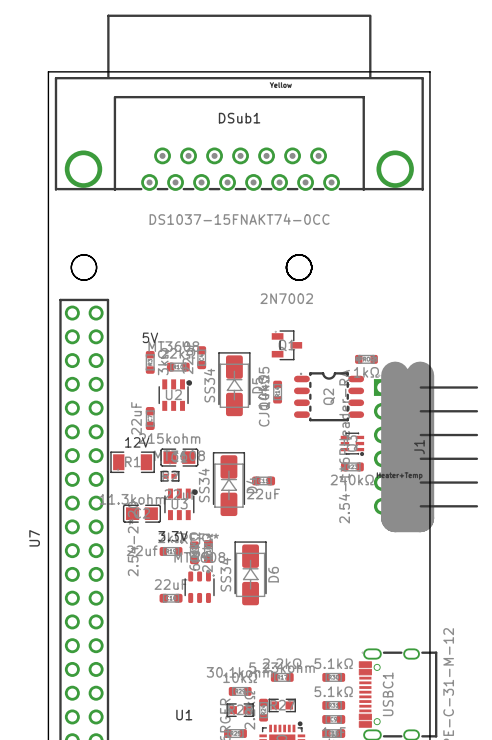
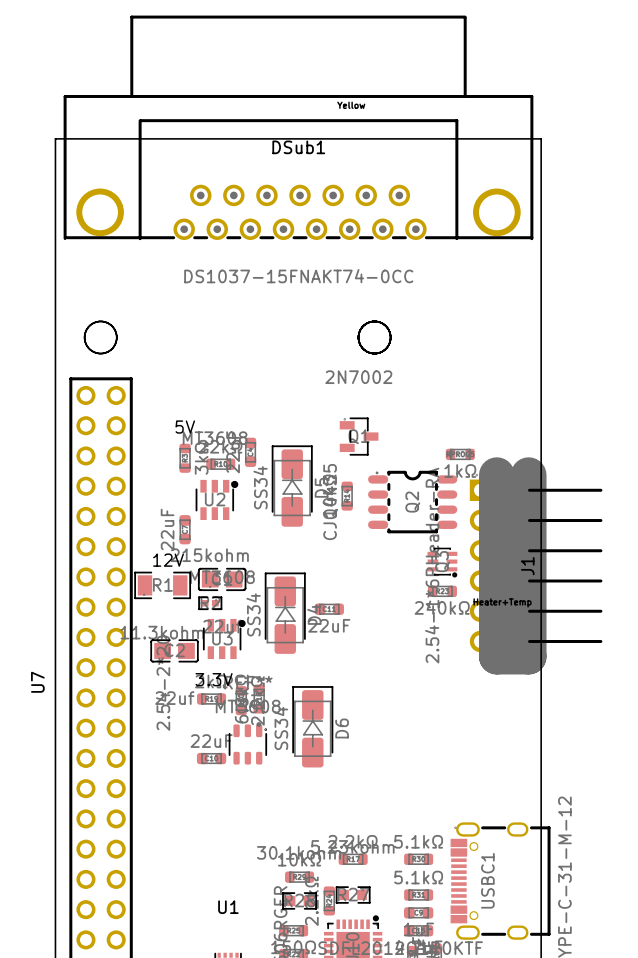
board edge: (48, 111) (48, 71) (429, 71) (429, 111) -> (55, 138) (541, 138)

